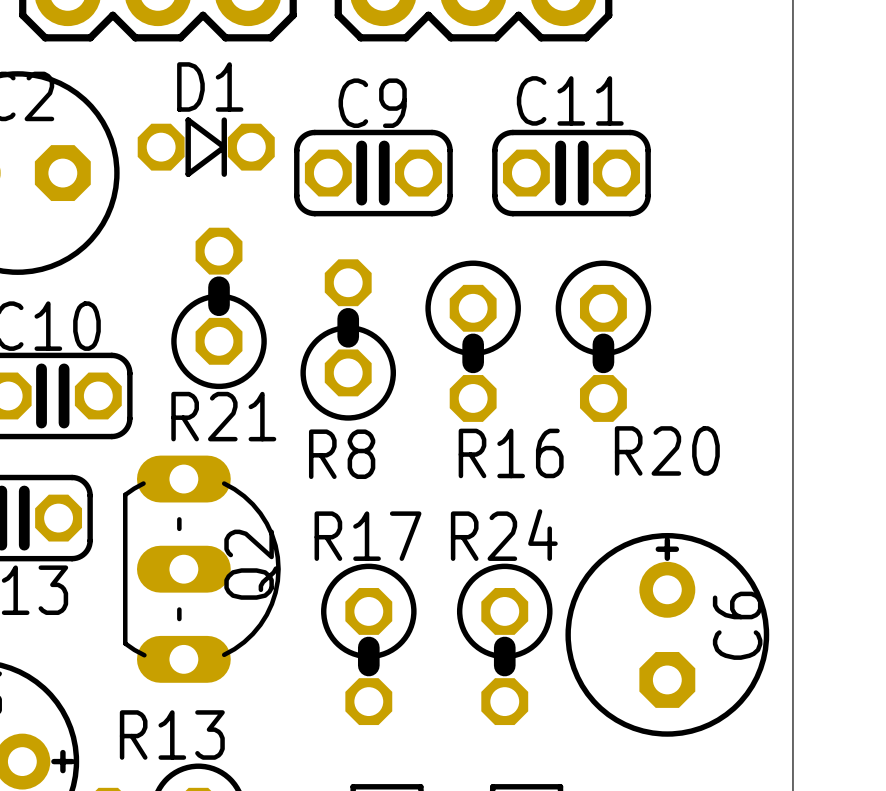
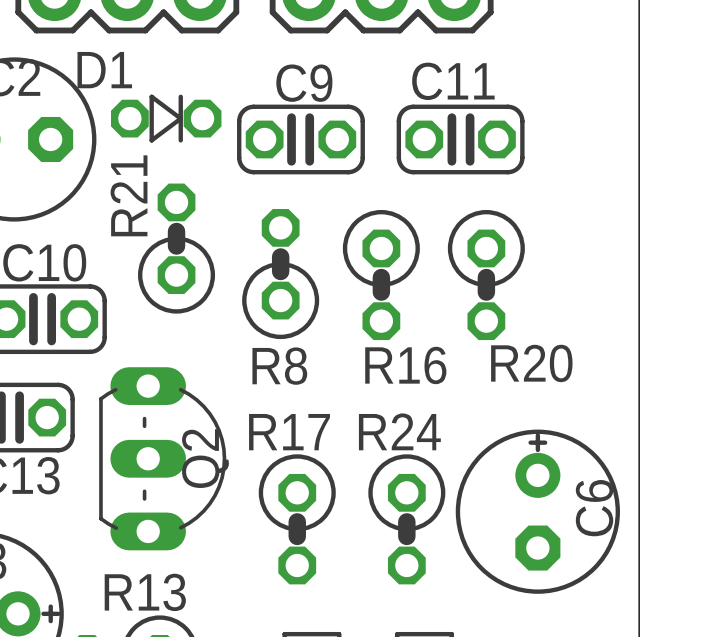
D1 name position: D1 (210, 86) -> D1 (104, 70)
R21 name rotation: 0° (223, 416) -> 90° counterclockwise (129, 195)
R21 name position: R21 (223, 416) -> R21 (129, 195)

